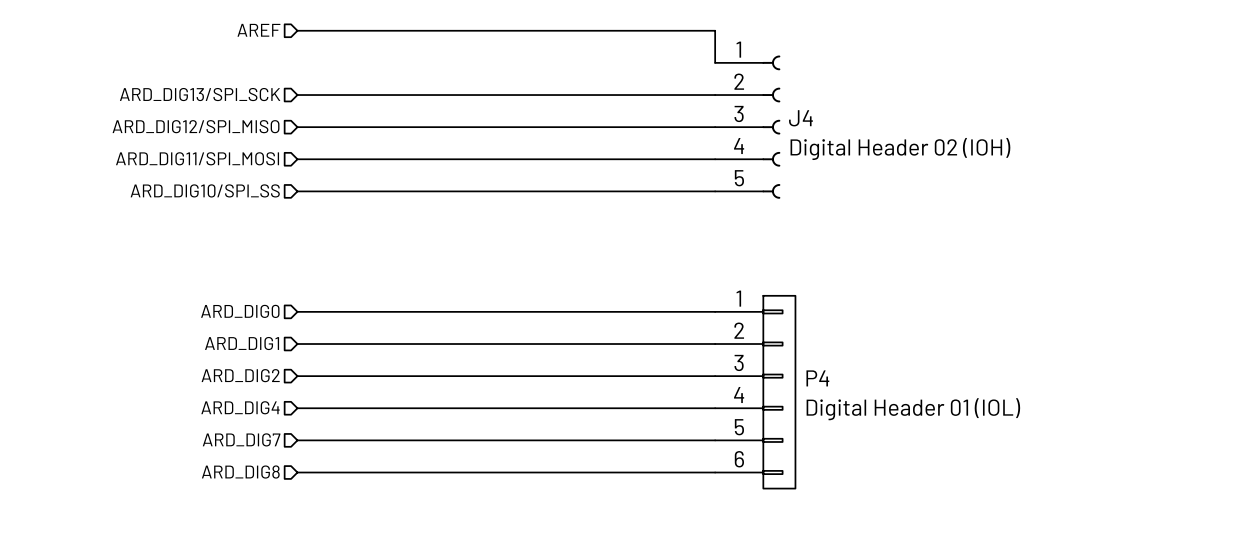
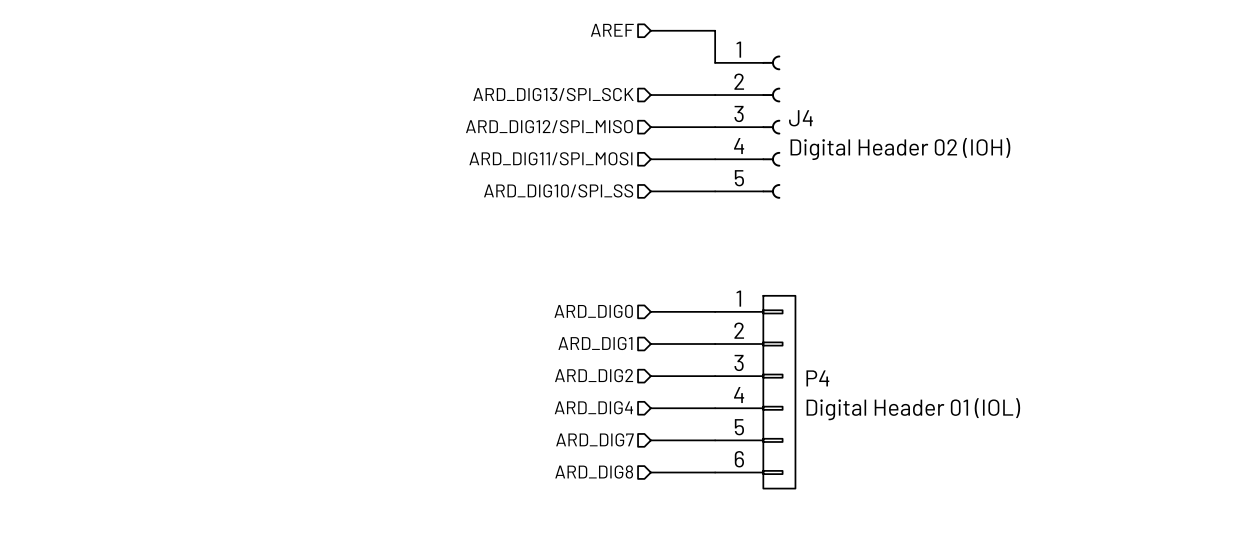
hierarchical label: AREF (258, 30) -> none
wire: (297, 30) (650, 30) -> none
hierarchical label: none -> AREF (612, 30)
hierarchical label: ARD_DIG13/SPI_SCK (200, 94) -> none
hierarchical label: none -> ARD_DIG13/SPI_SCK (553, 94)
wire: (297, 95) (650, 95) -> none
hierarchical label: ARD_DIG12/SPI_MISO (196, 126) -> none
hierarchical label: none -> ARD_DIG12/SPI_MISO (549, 126)
wire: (297, 127) (650, 127) -> none
hierarchical label: ARD_DIG11/SPI_MOSI (197, 158) -> none
hierarchical label: none -> ARD_DIG11/SPI_MOSI (550, 158)
wire: (297, 159) (650, 159) -> none
hierarchical label: ARD_DIG10/SPI_SS (205, 190) -> none
hierarchical label: none -> ARD_DIG10/SPI_SS (558, 190)
wire: (297, 191) (650, 191) -> none
hierarchical label: ARD_DIG0 (240, 311) -> none
wire: (297, 311) (650, 311) -> none
hierarchical label: none -> ARD_DIG0 (593, 311)
hierarchical label: ARD_DIG1 (242, 343) -> none
hierarchical label: none -> ARD_DIG1 (595, 343)
wire: (297, 344) (650, 344) -> none
hierarchical label: ARD_DIG2 (240, 375) -> none
hierarchical label: none -> ARD_DIG2 (594, 375)
wire: (297, 376) (650, 376) -> none
hierarchical label: ARD_DIG4 (240, 407) -> none
hierarchical label: none -> ARD_DIG4 (593, 407)
wire: (297, 408) (650, 408) -> none
hierarchical label: ARD_DIG7 (241, 439) -> none
hierarchical label: none -> ARD_DIG7 (594, 439)
wire: (297, 440) (650, 440) -> none
hierarchical label: ARD_DIG8 (240, 472) -> none
wire: (297, 472) (650, 472) -> none
hierarchical label: none -> ARD_DIG8 (594, 472)

